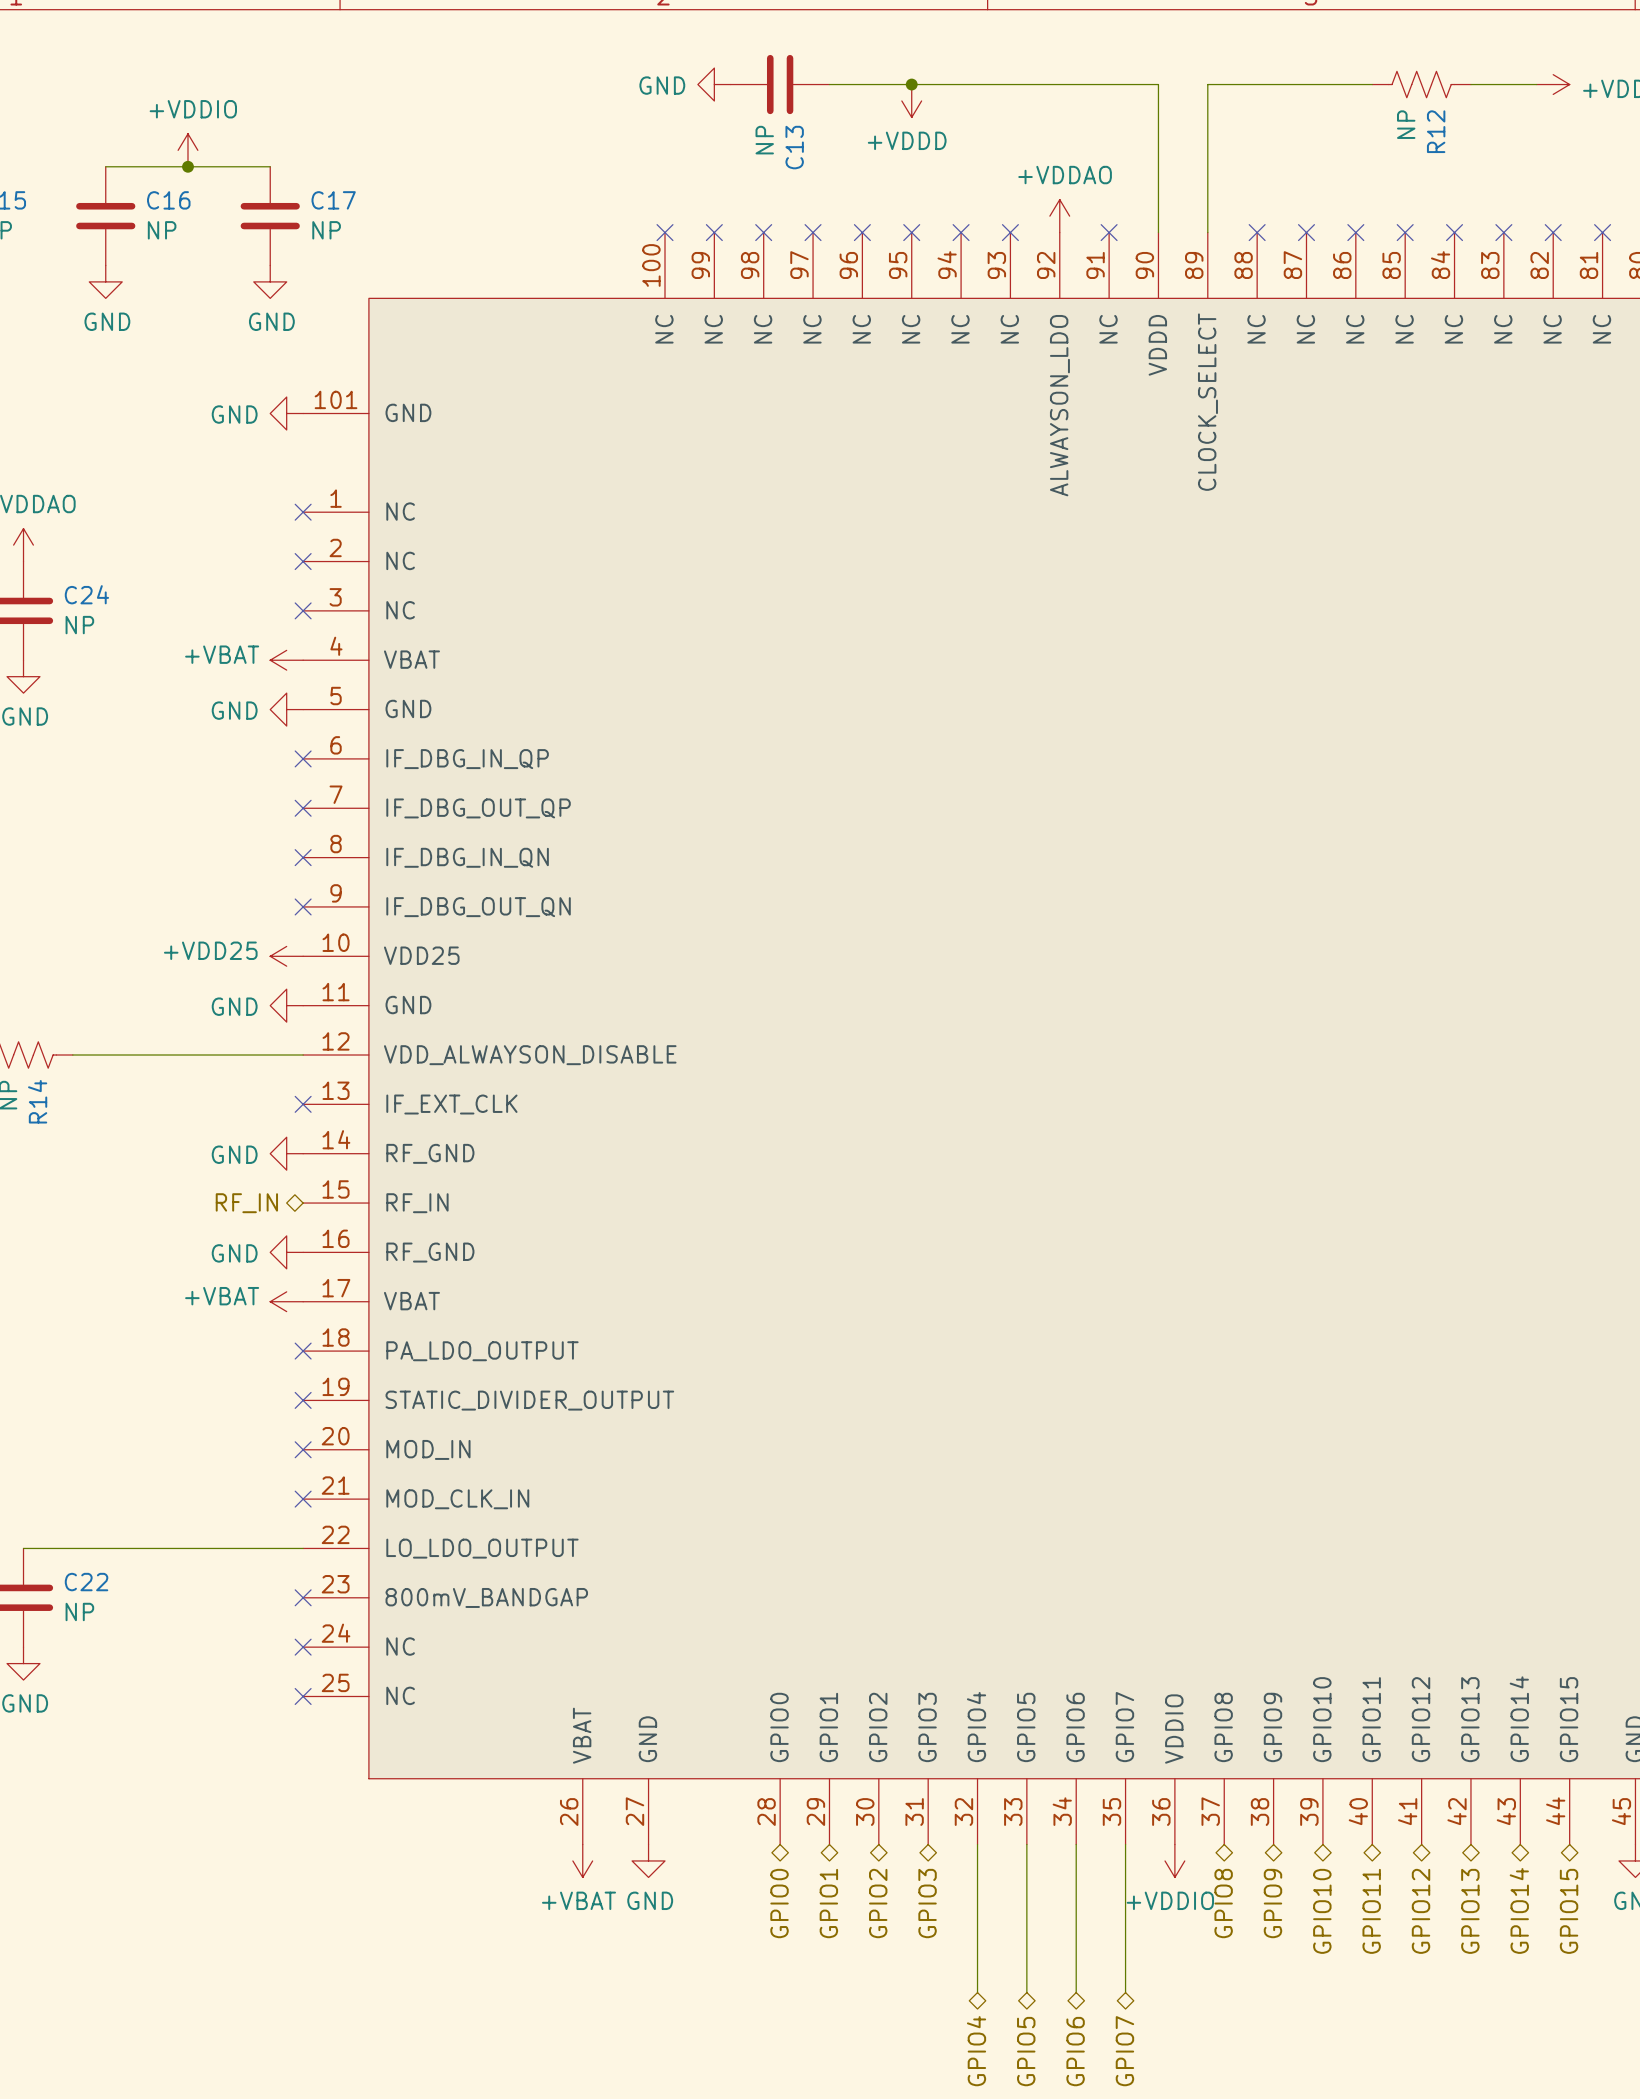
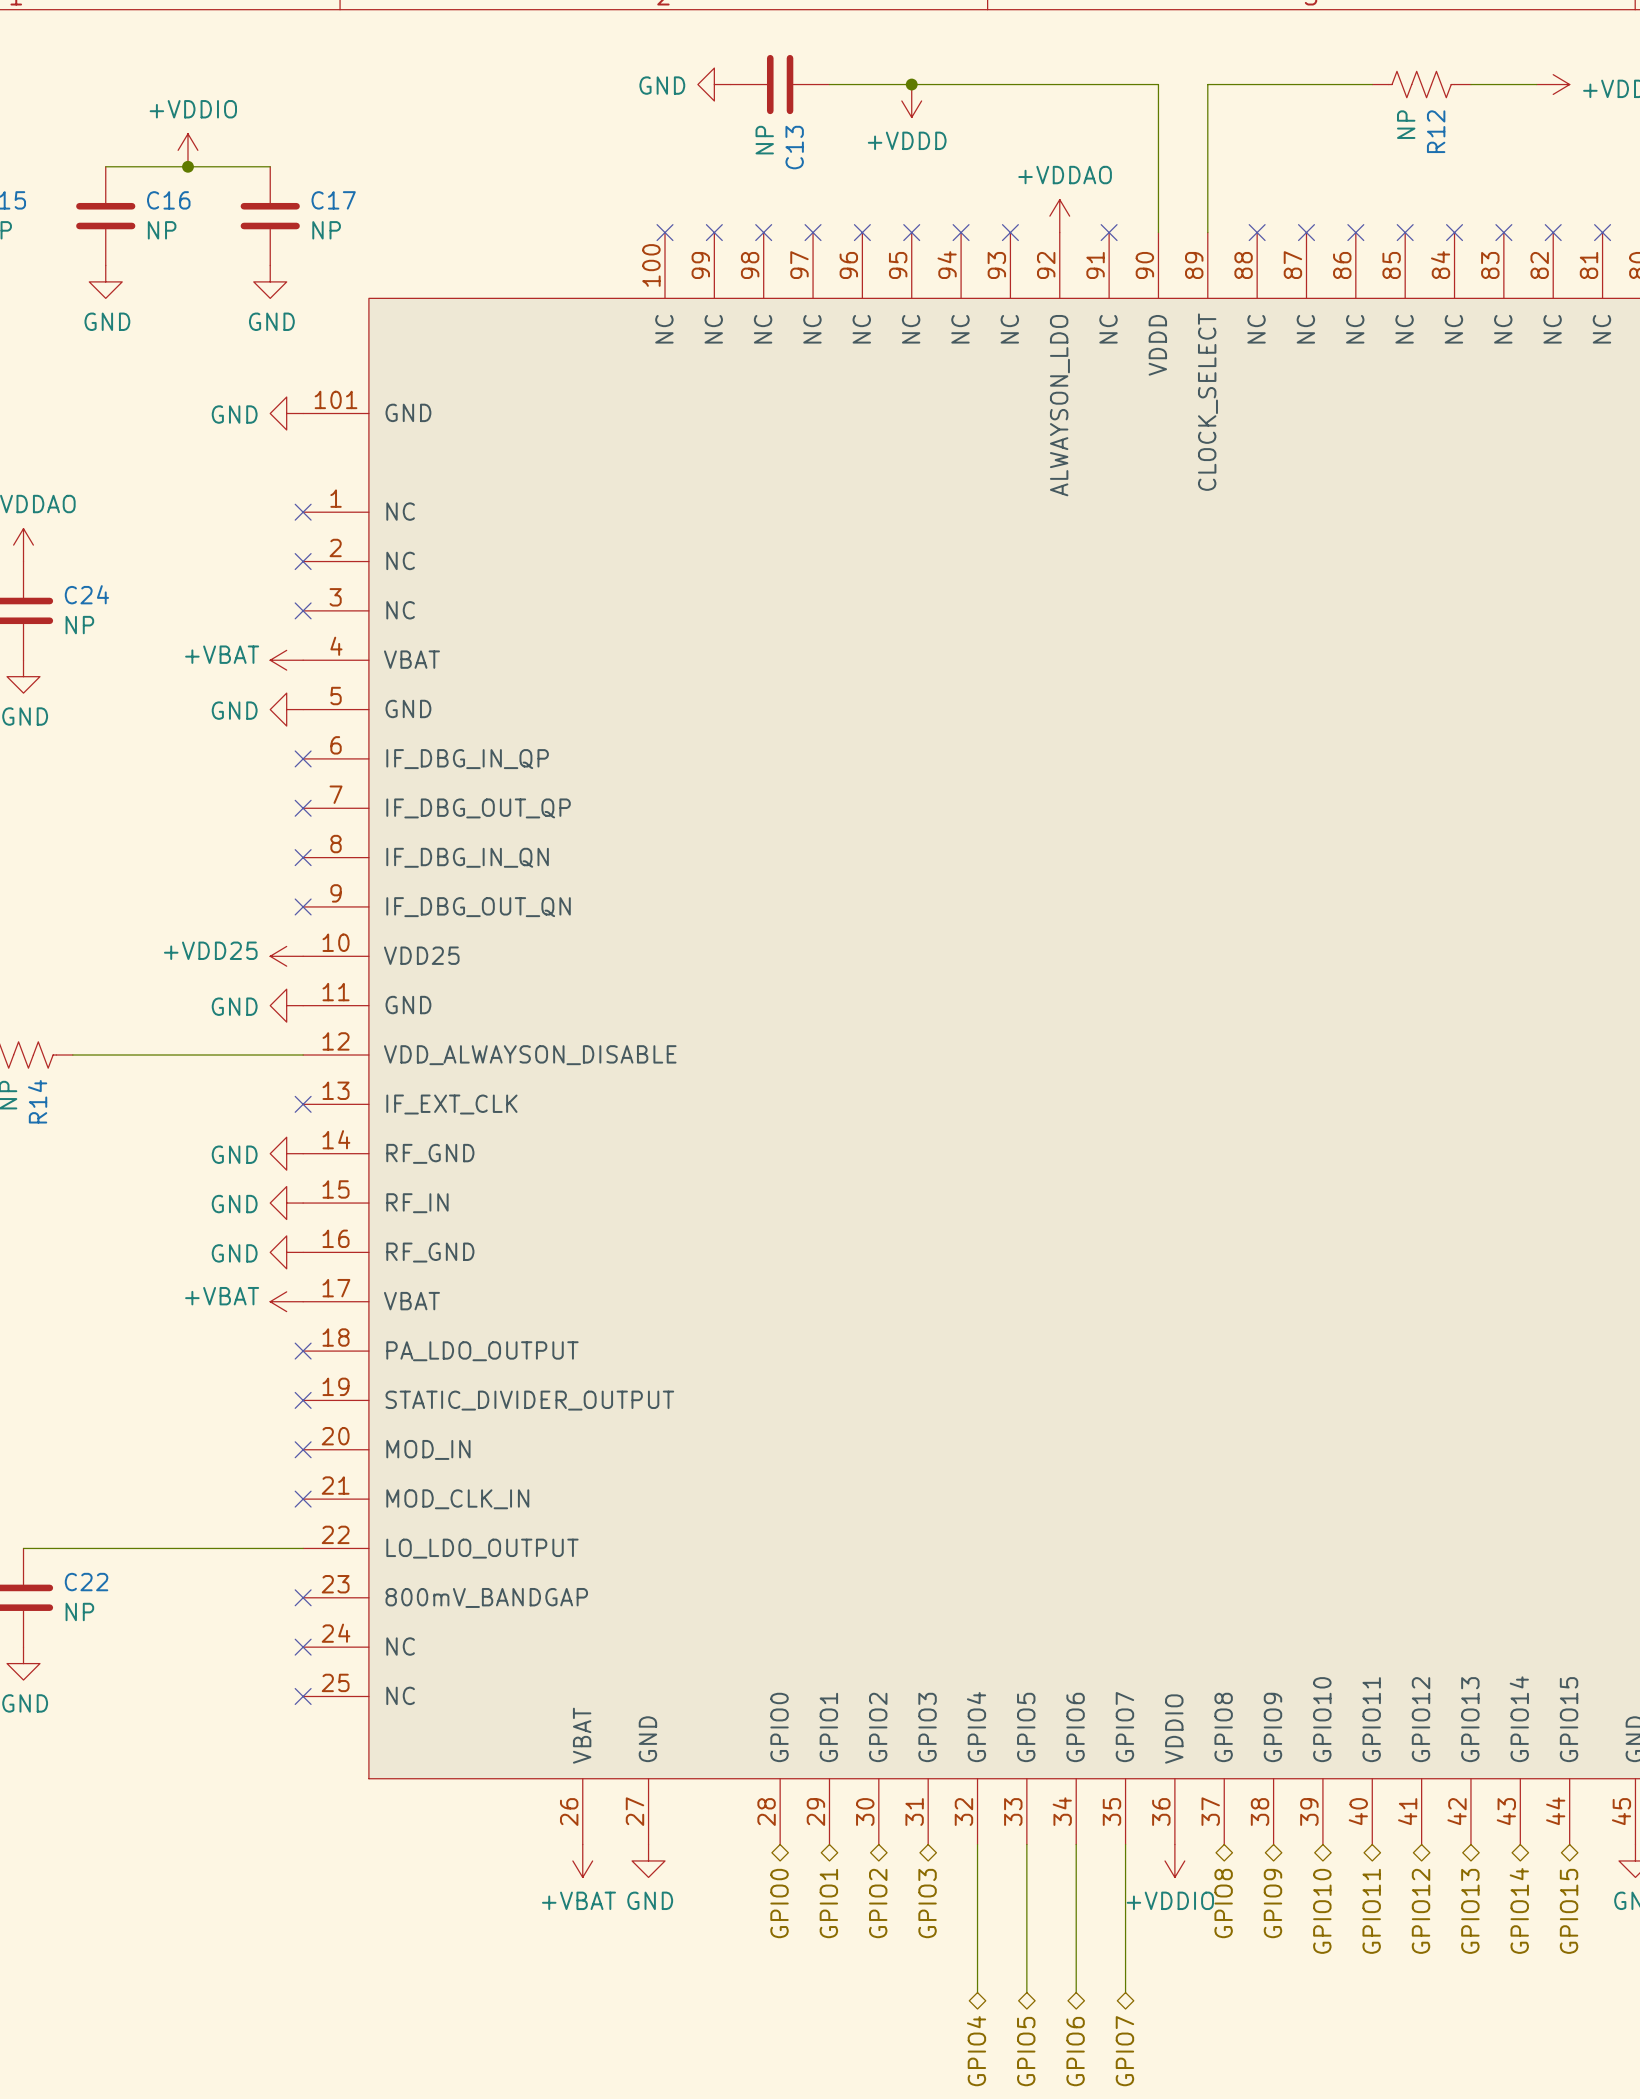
hierarchical label: RF_IN (246, 1203) -> none
power symbol: none -> GND (286, 1203)

